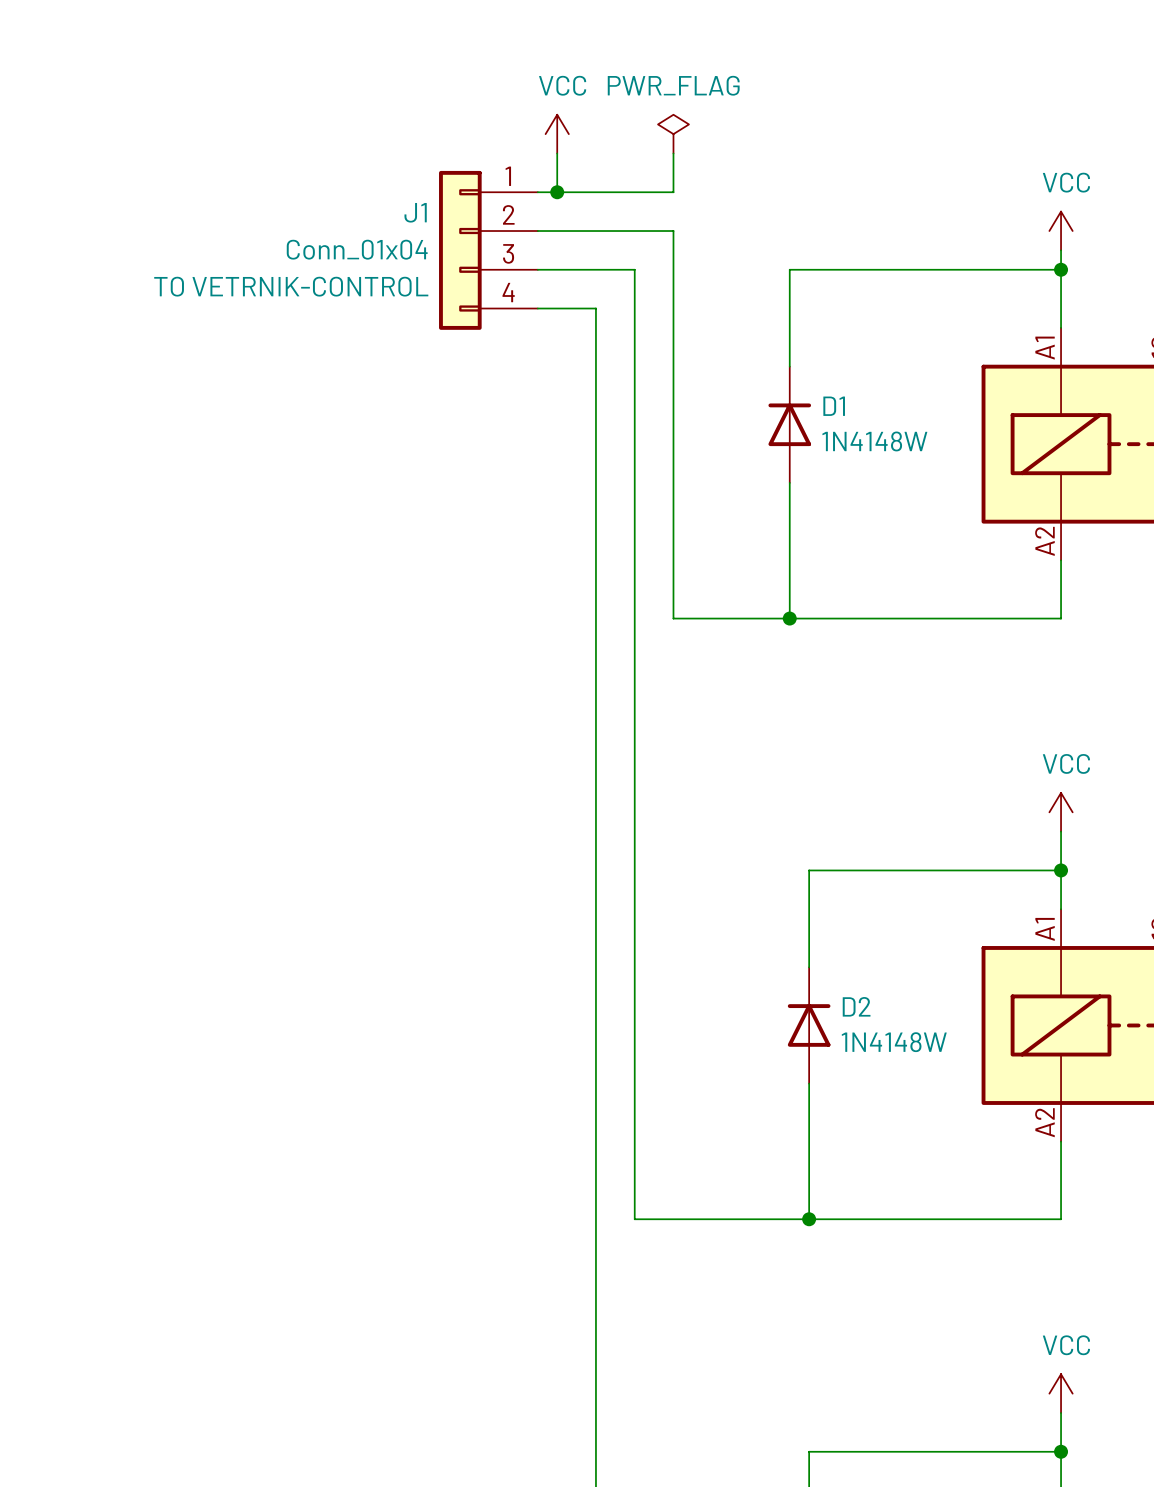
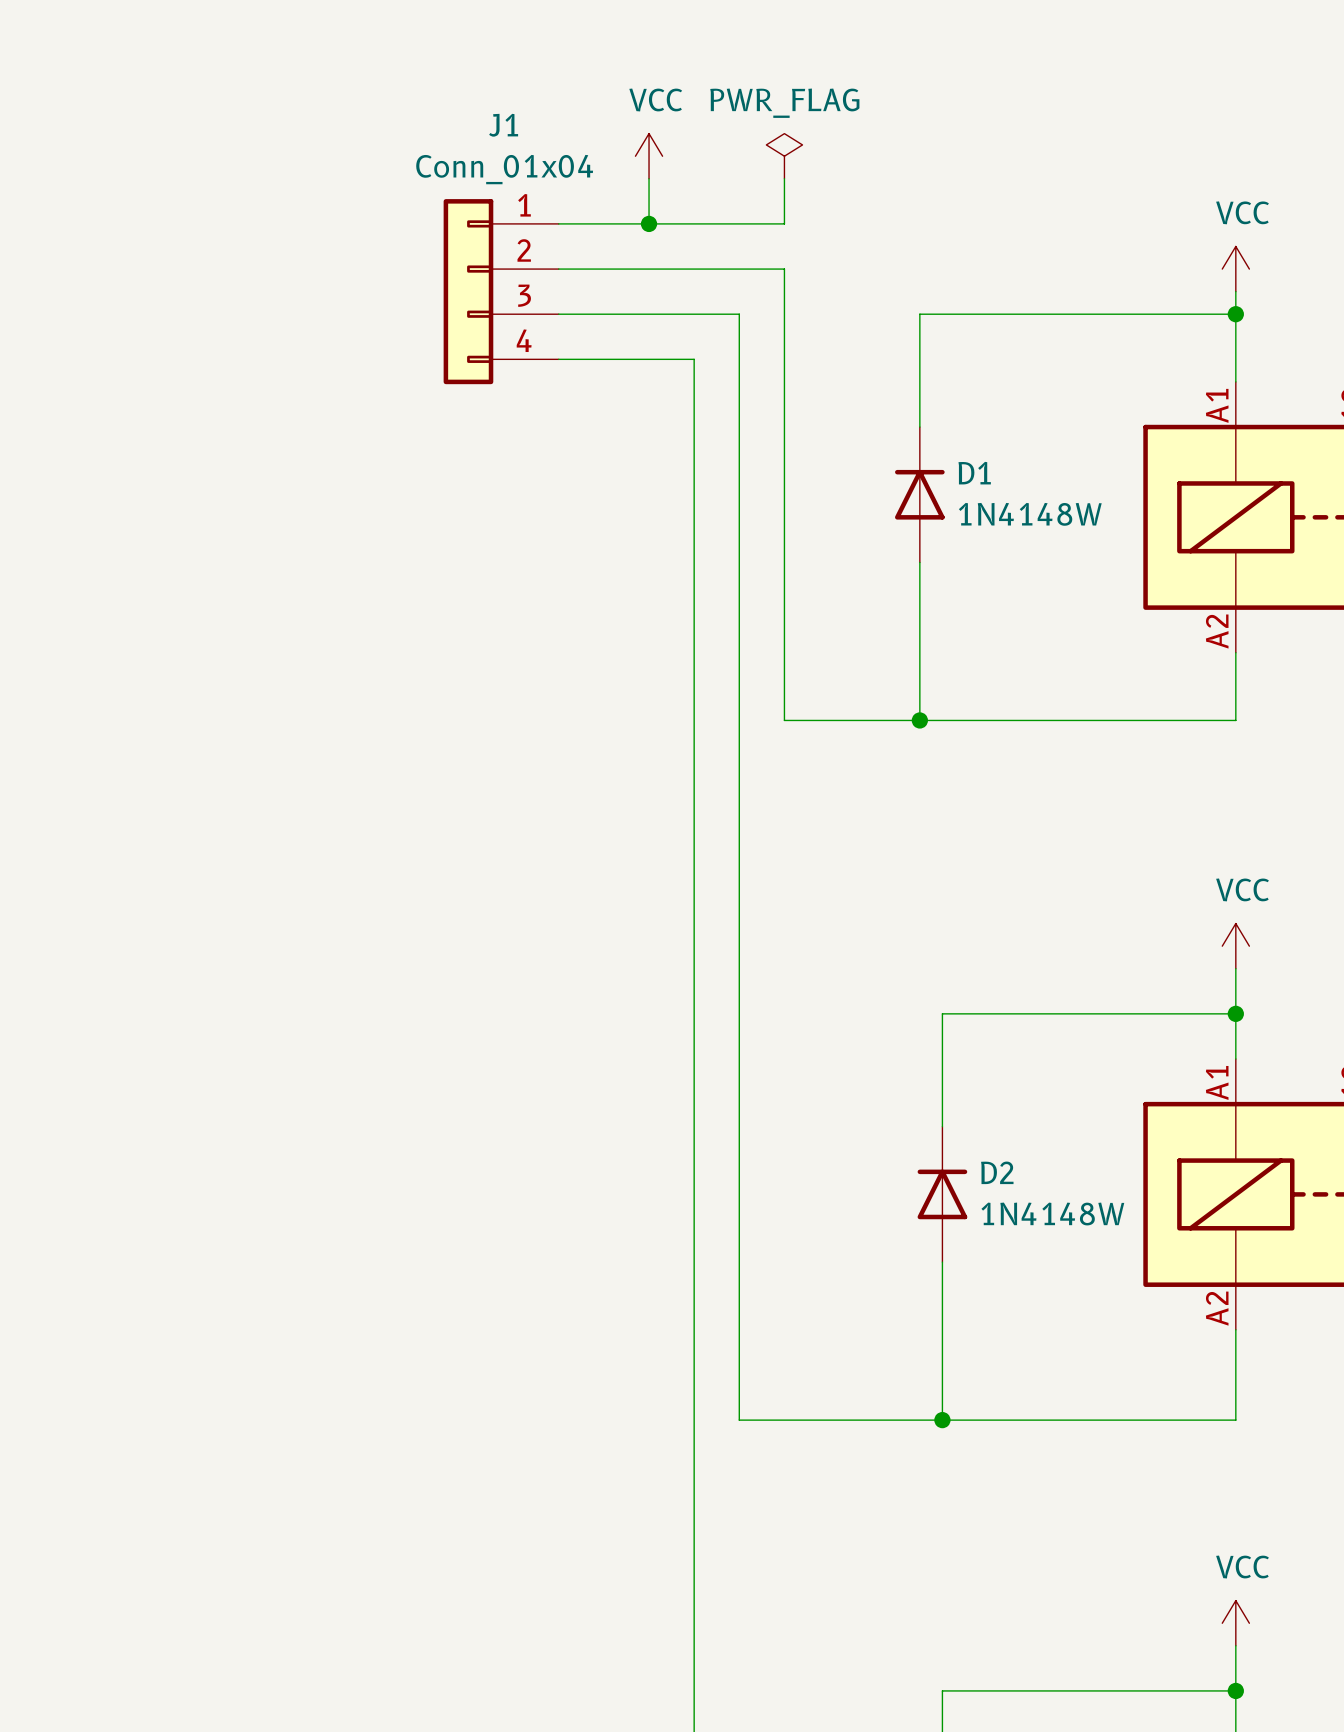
J1 name position: J1 (415, 212) -> J1 (503, 125)
J1 value position: Conn_01x04 (357, 249) -> Conn_01x04 (504, 169)
J1 position: (488, 250) -> (501, 291)
J1 text: TO VETRNIK-CONTROL (291, 286) -> none

